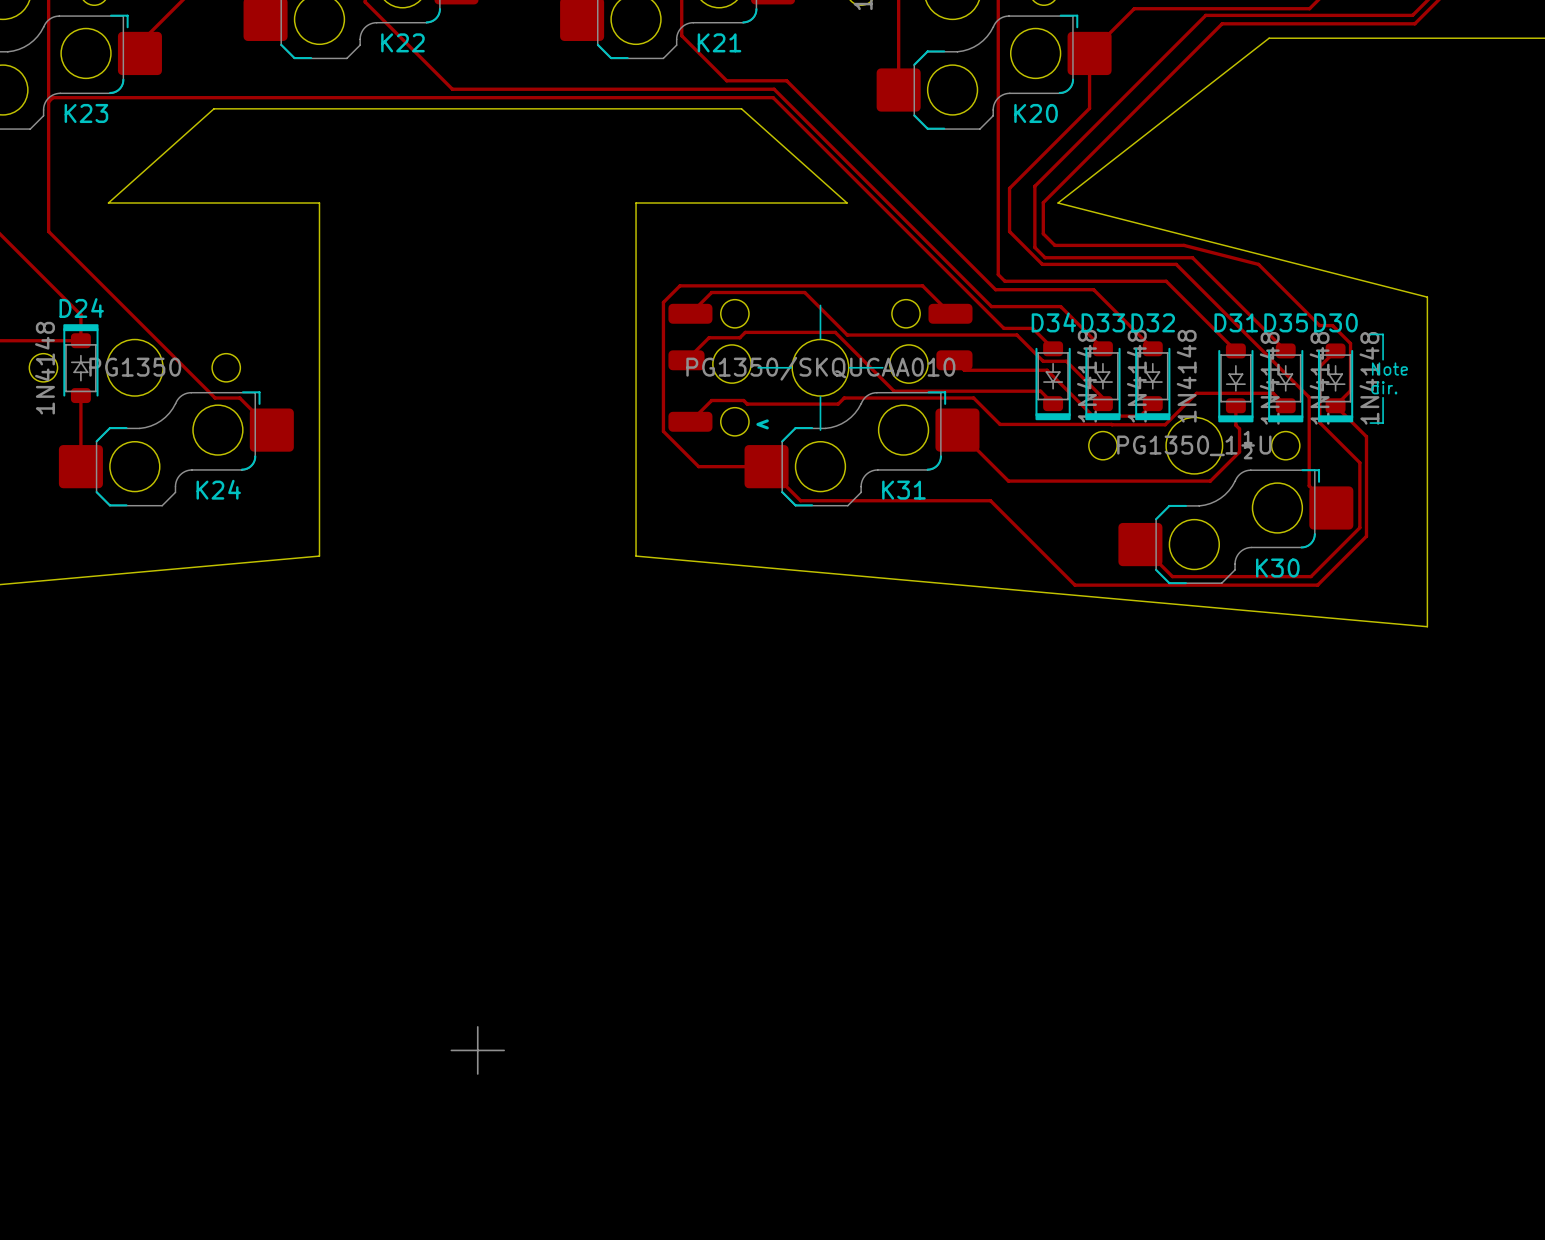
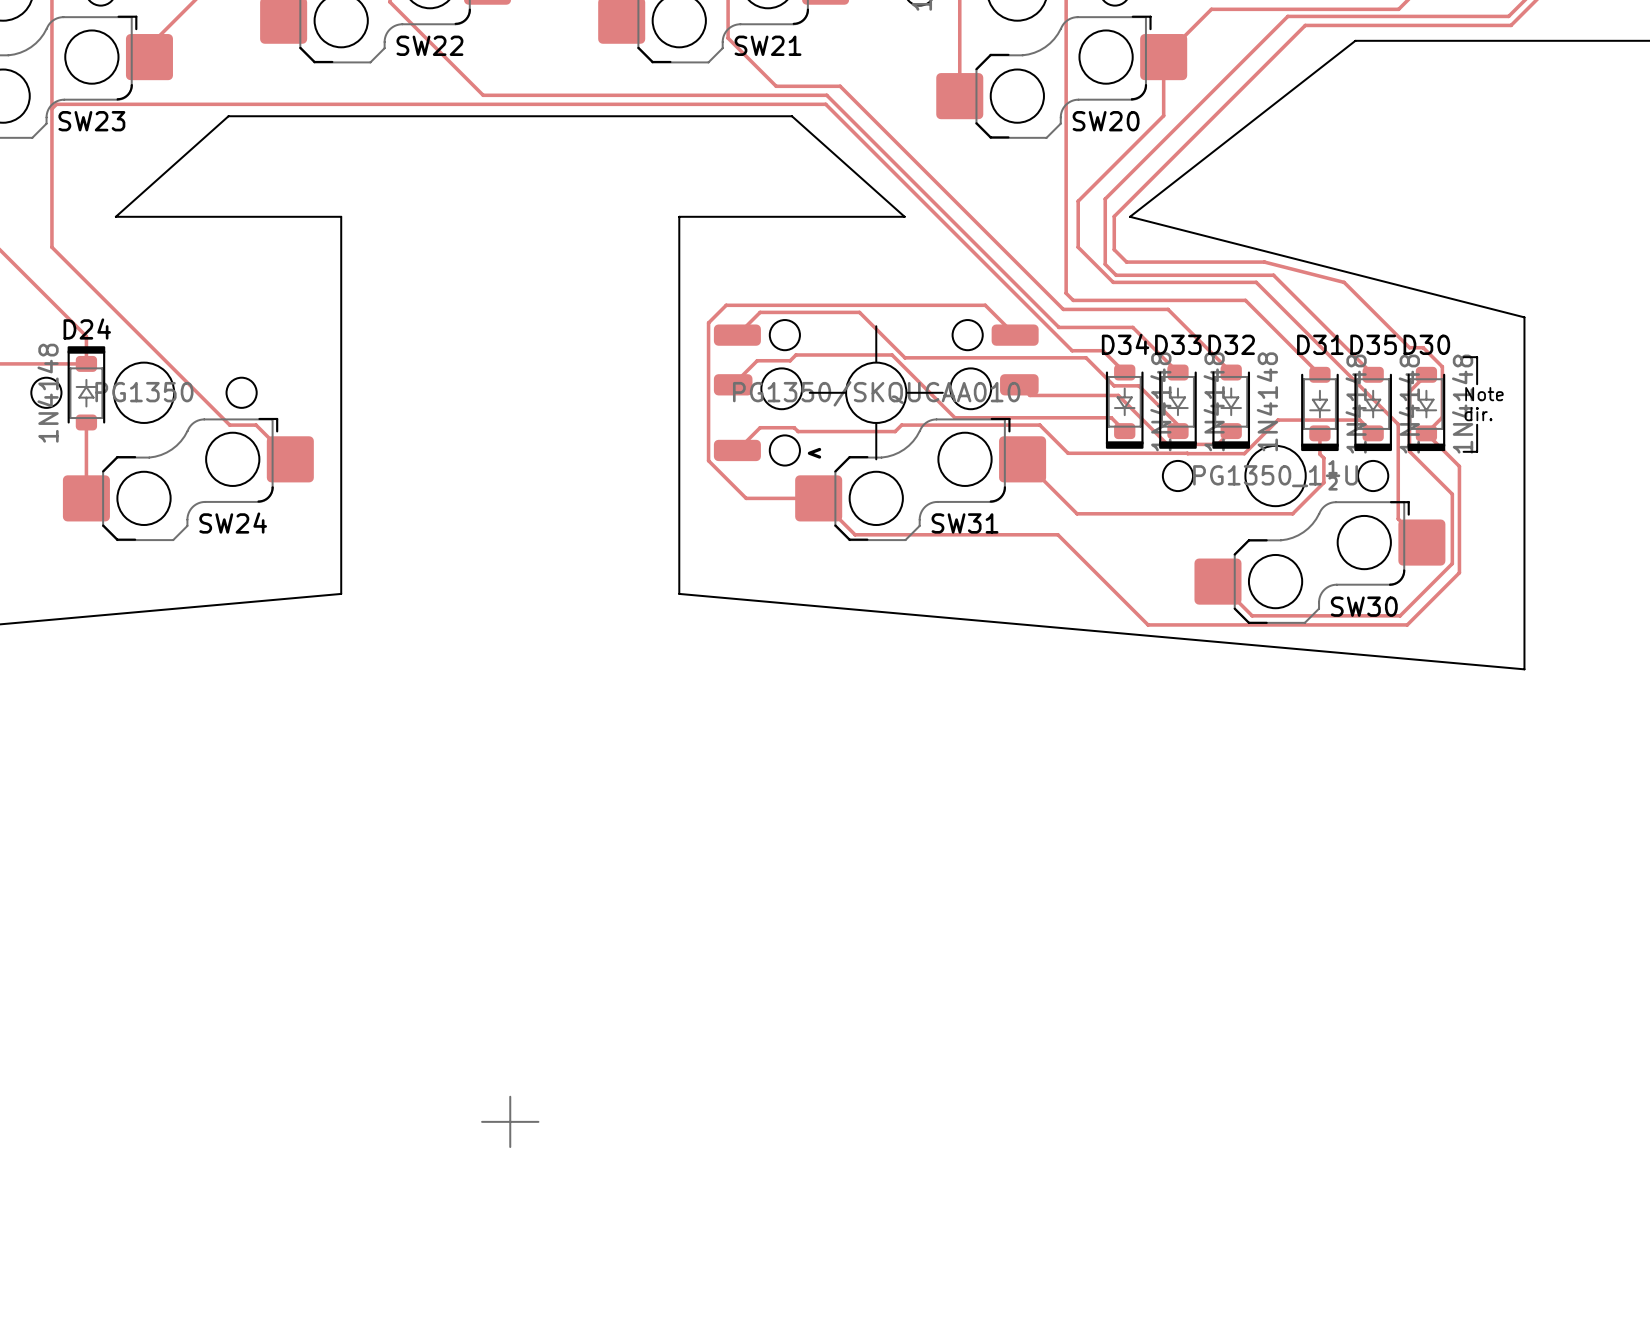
K22 name: K22 (402, 42) -> SW22 (429, 45)
K21 name: K21 (719, 42) -> SW21 (768, 45)
K23 name: K23 (86, 113) -> SW23 (91, 121)
K20 name: K20 (1036, 113) -> SW20 (1106, 121)
K24 name: K24 (218, 489) -> SW24 (233, 523)
K31 name: K31 (903, 490) -> SW31 (965, 523)
K30 name: K30 (1277, 568) -> SW30 (1364, 606)

